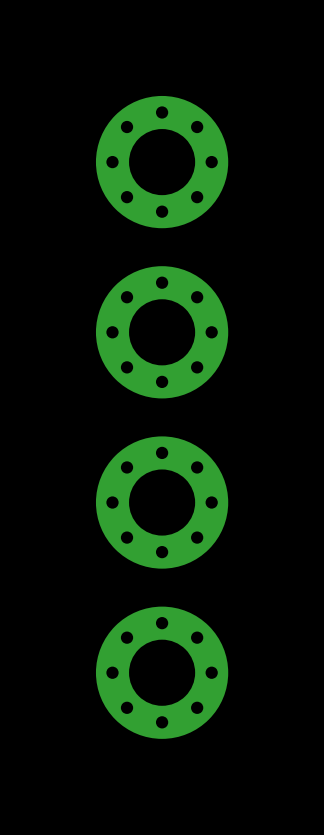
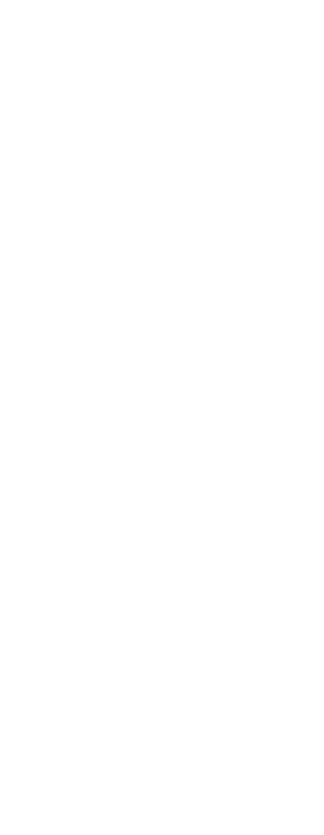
part: (162, 162) -> none
part: (162, 332) -> none
part: (162, 502) -> none
part: (162, 672) -> none

